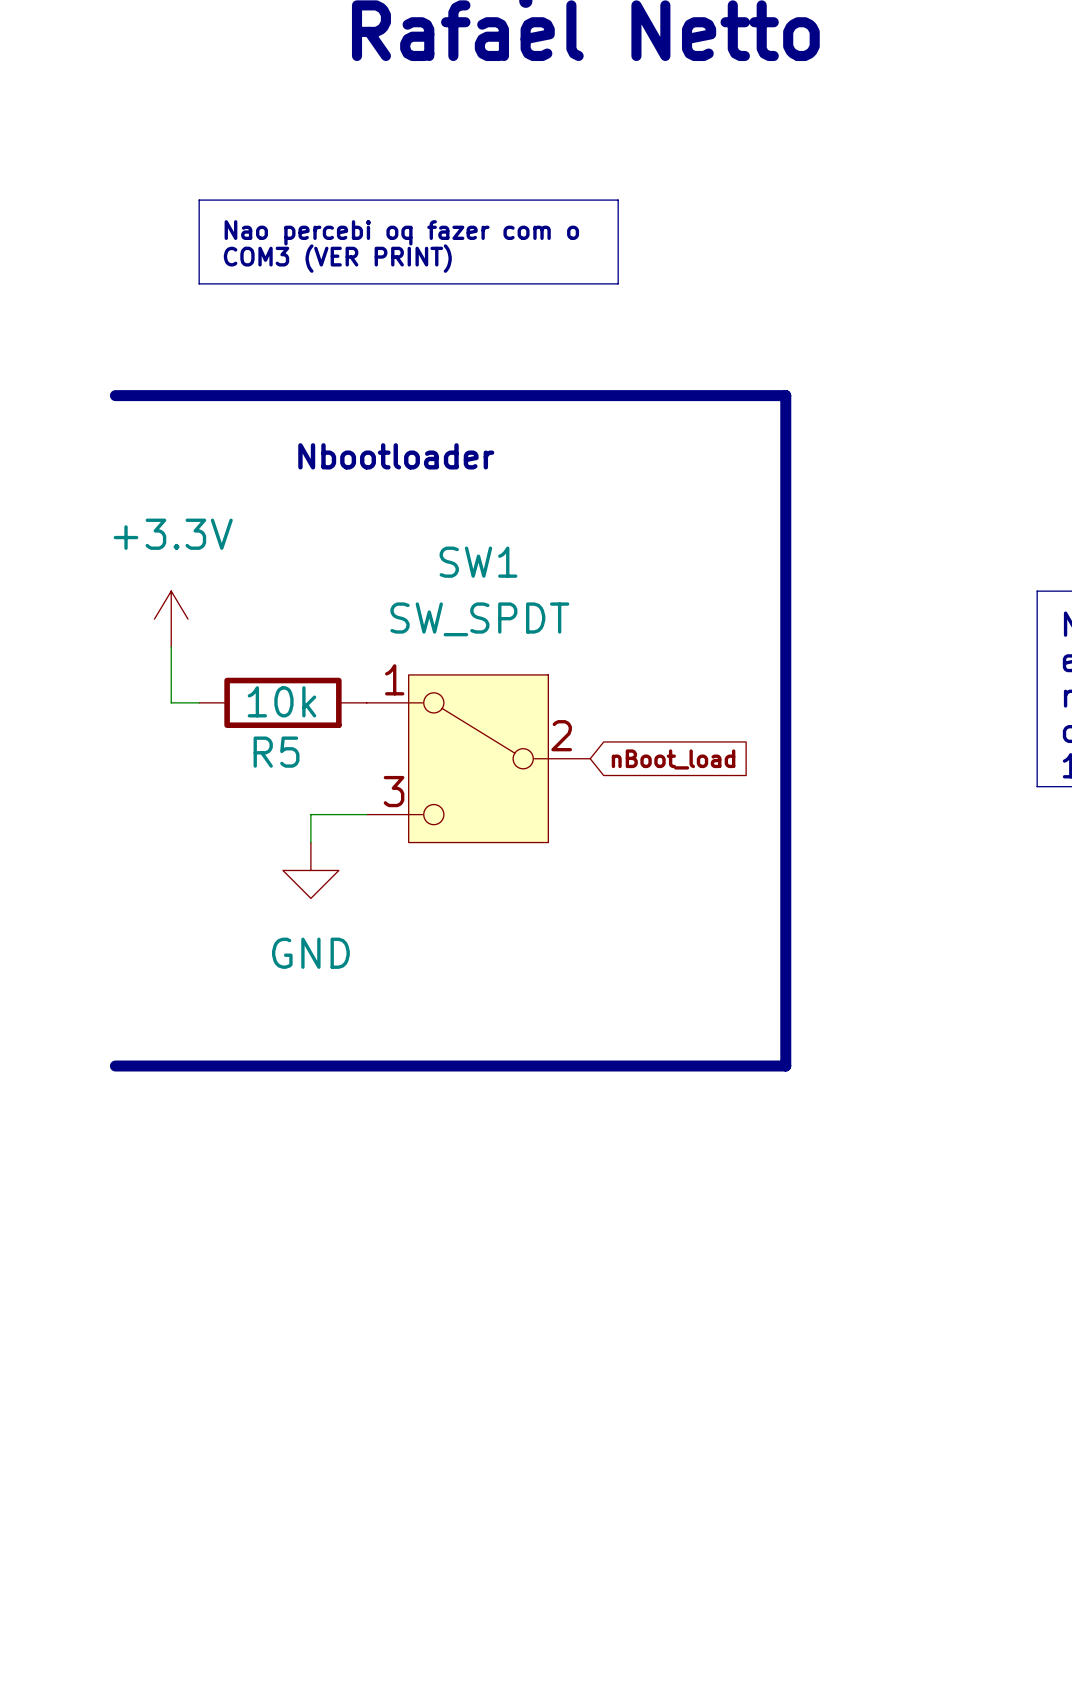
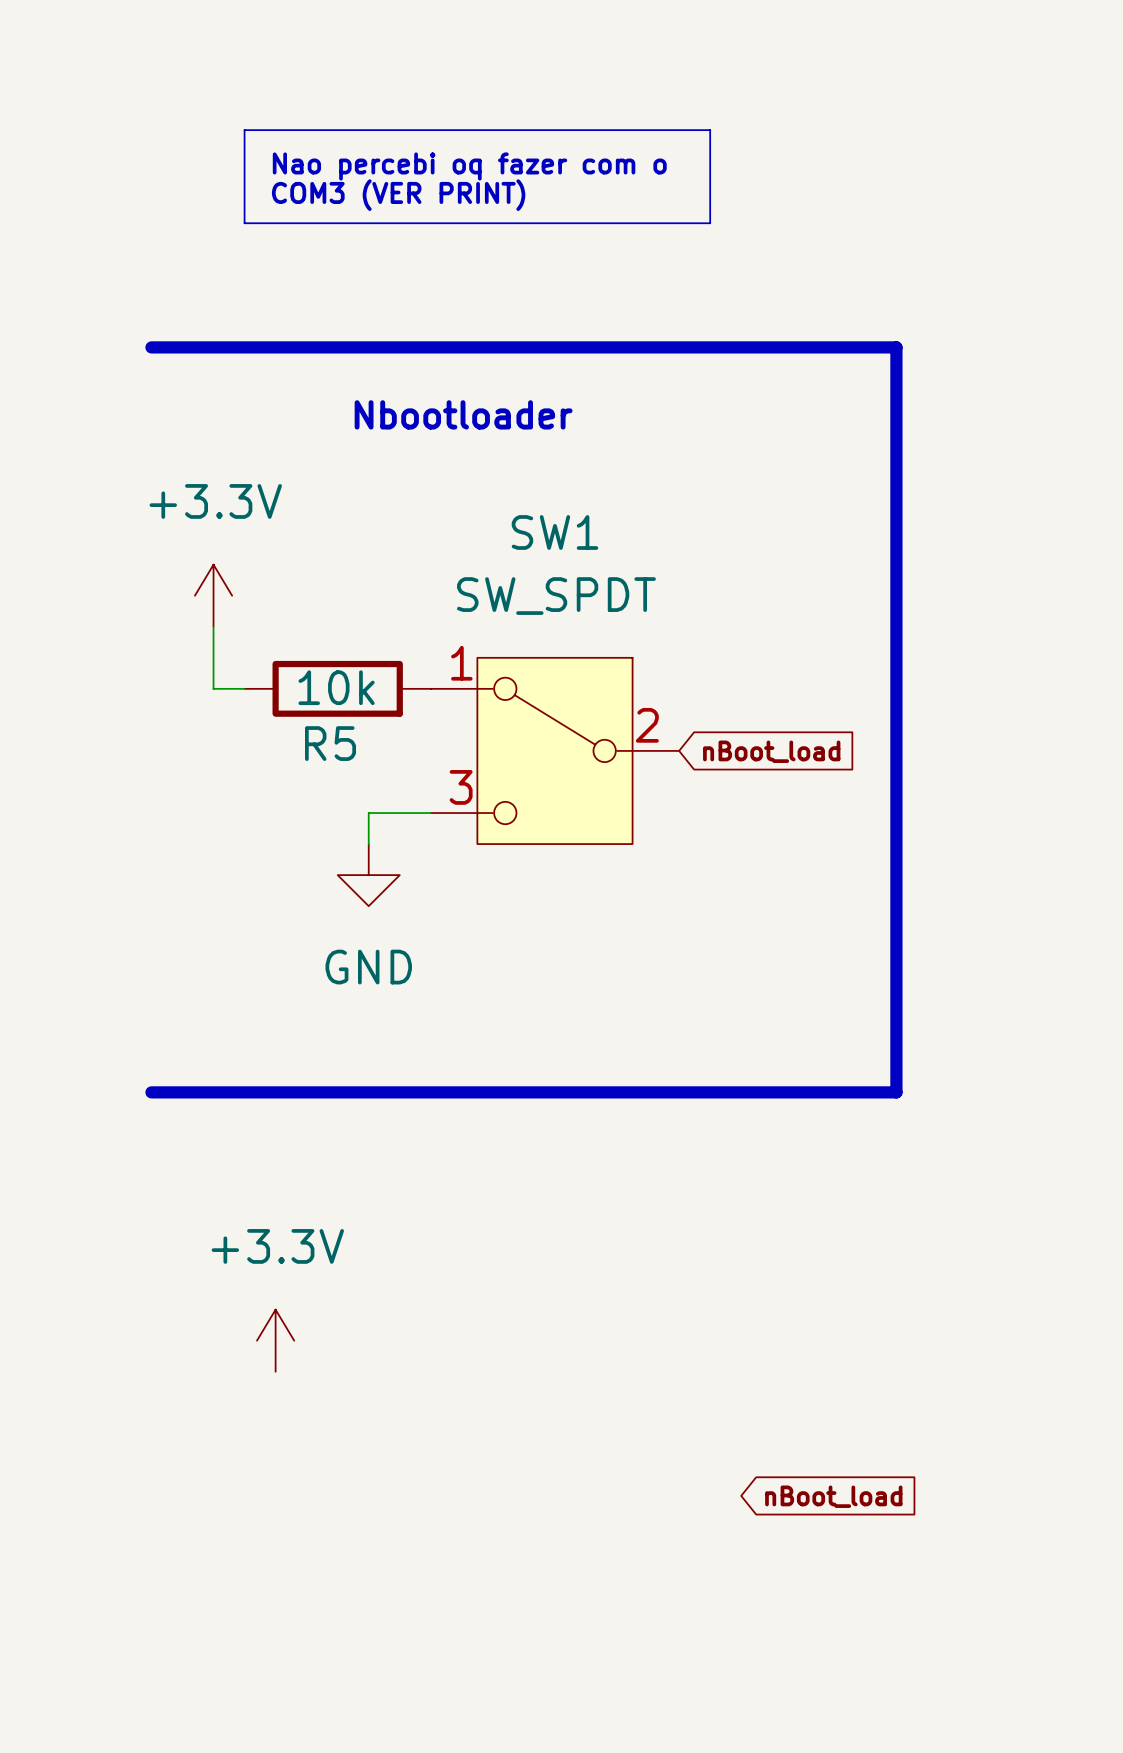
power symbol: none -> +3.3V (275, 1340)
global label: none -> nBoot_load (833, 1496)

